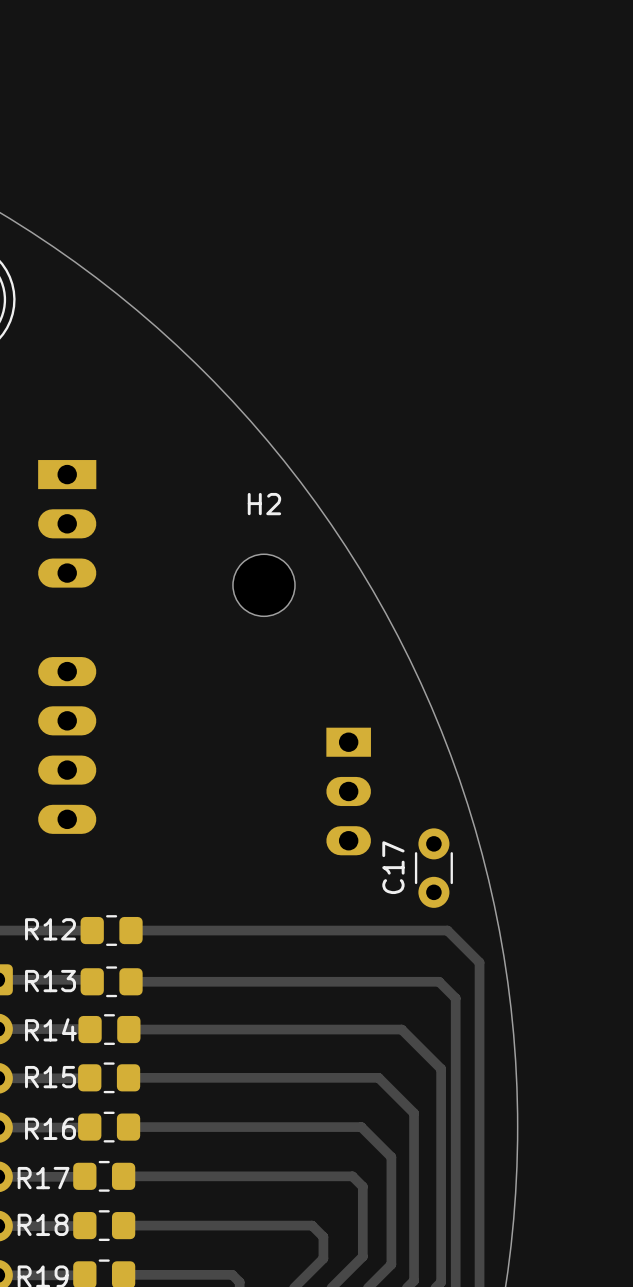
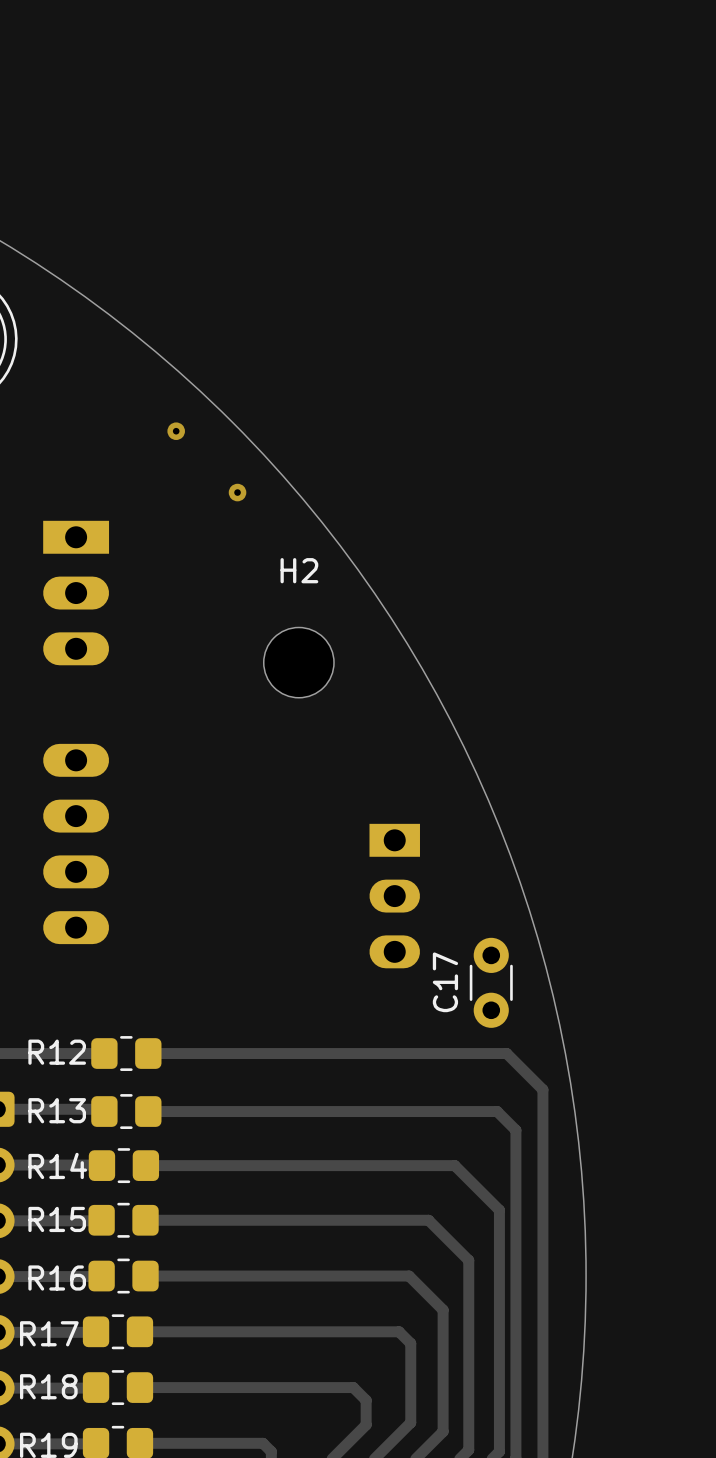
via: none -> (176, 431)
via: none -> (237, 492)

